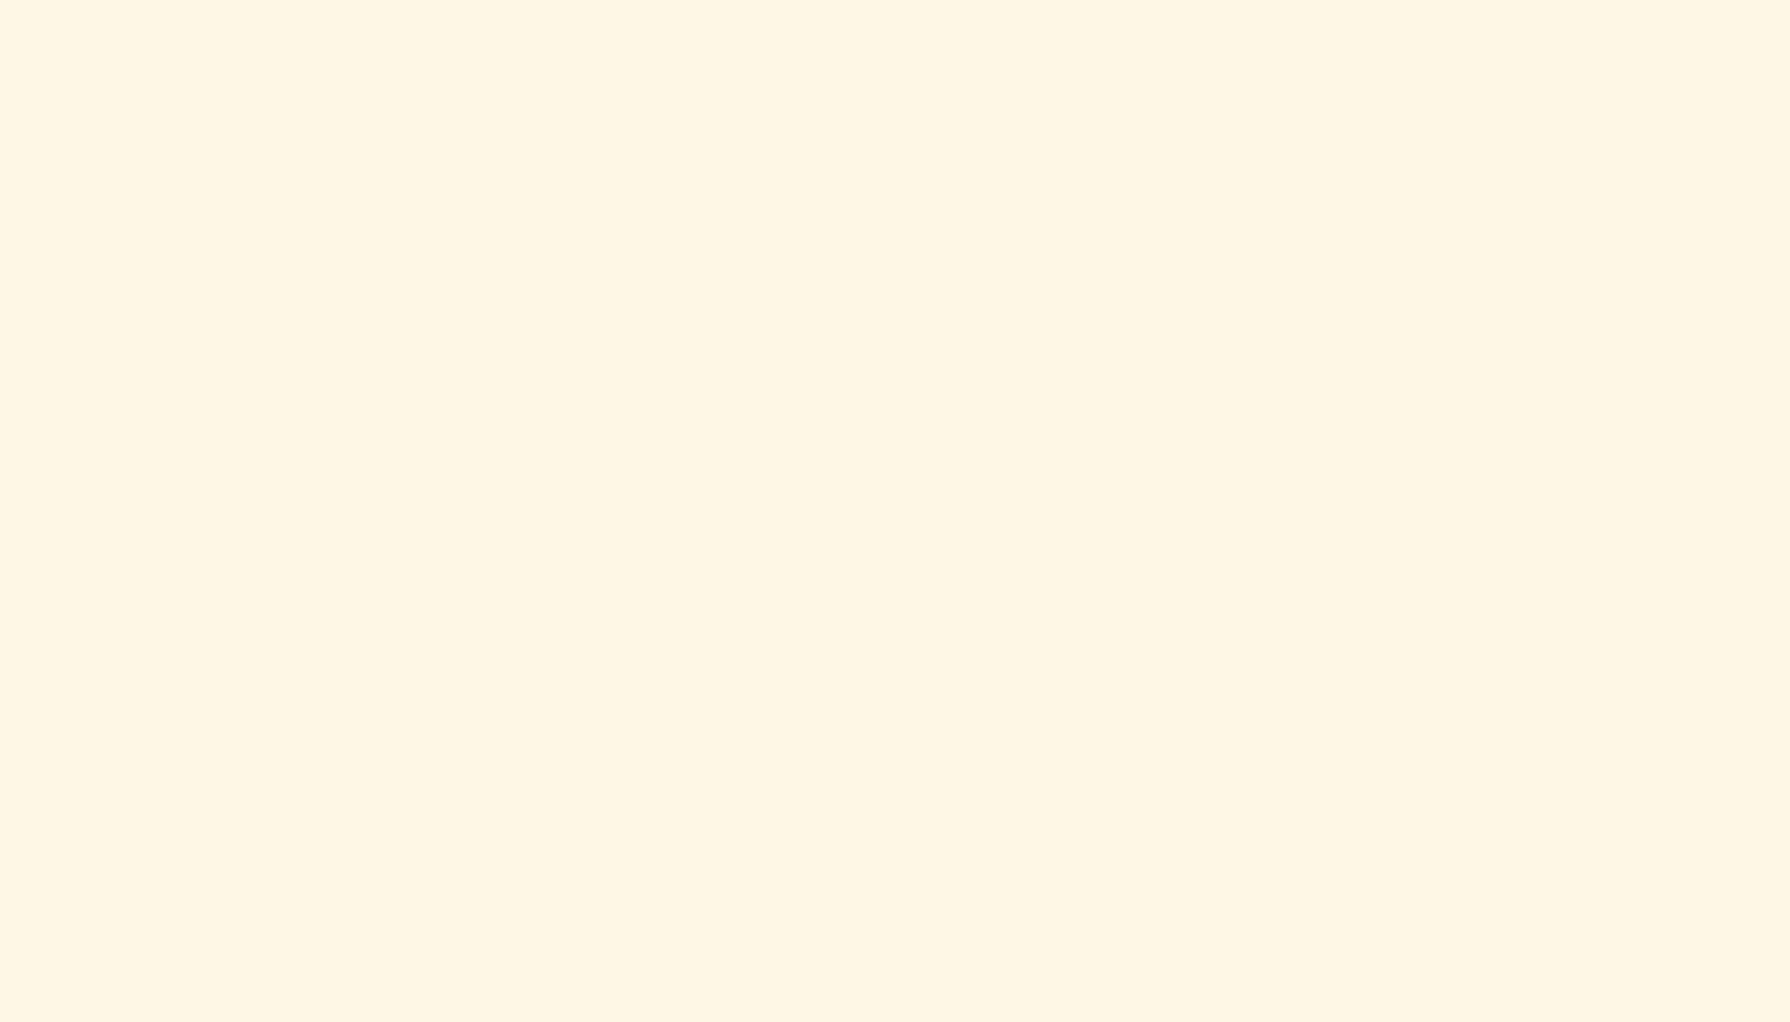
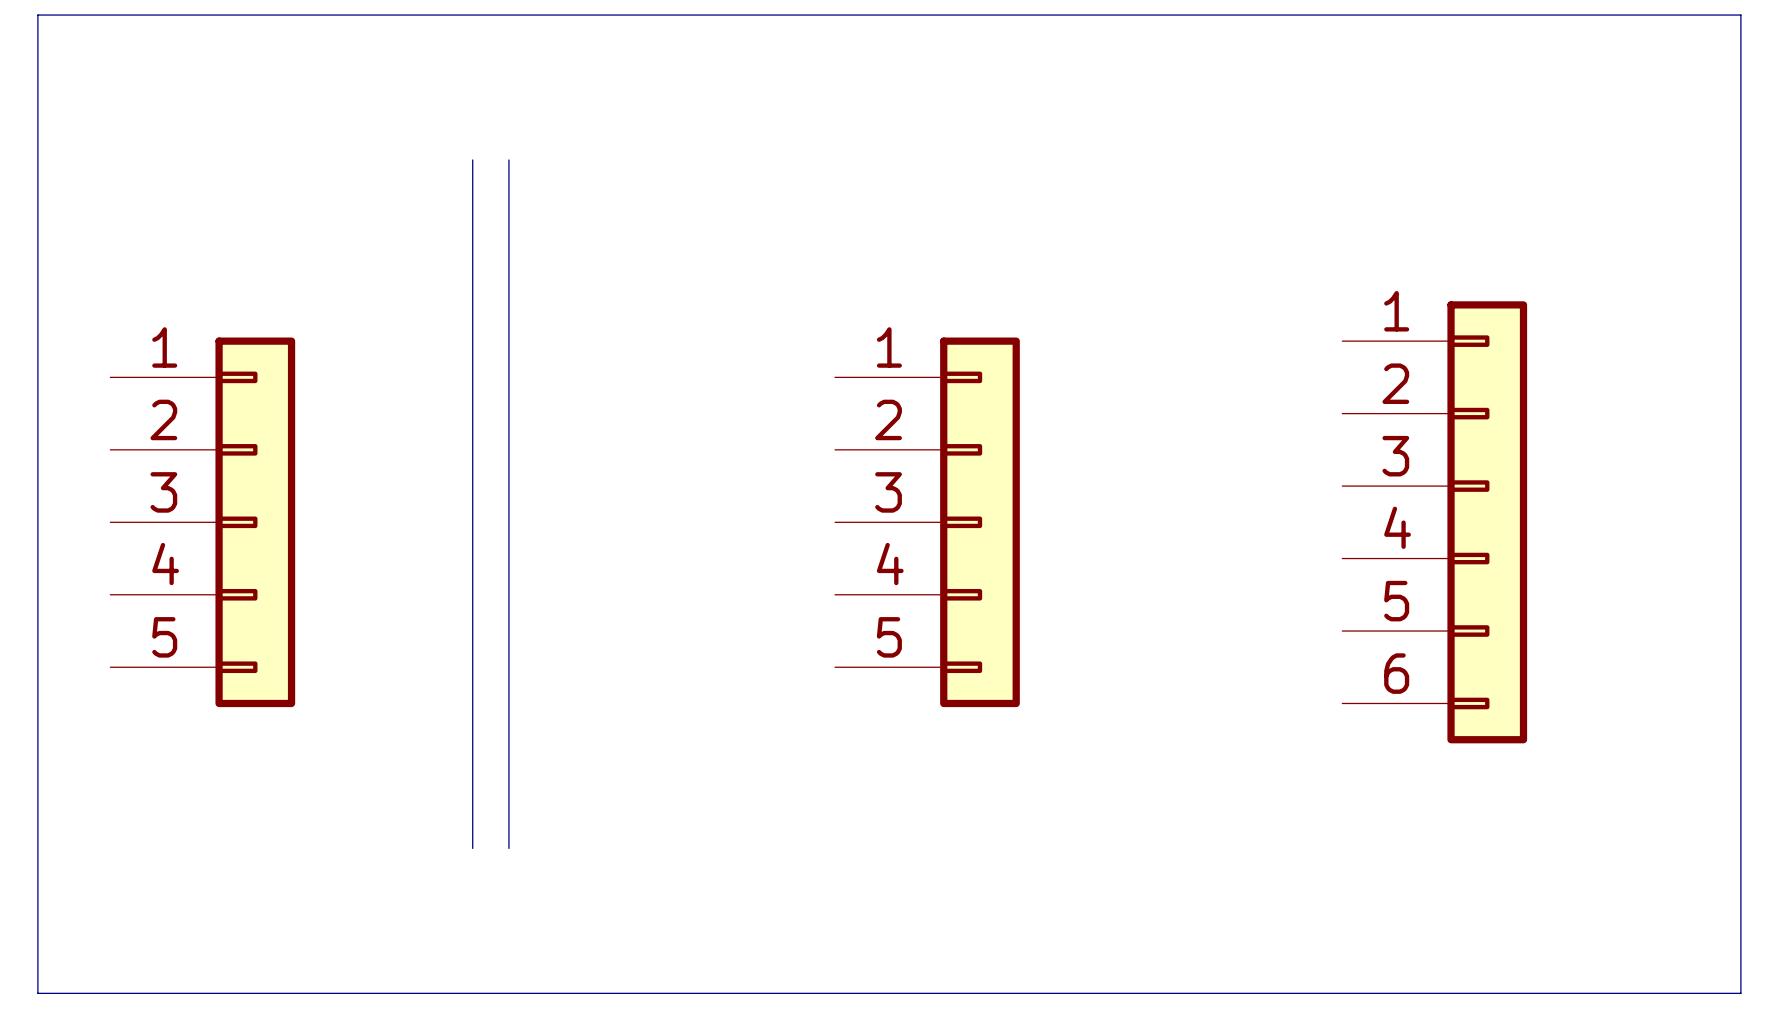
line: none -> (37, 15) (1740, 15) (1740, 993) (37, 993) (37, 15)
line: none -> (472, 159) (472, 848)
line: none -> (508, 159) (508, 848)
part: none -> (202, 522)
part: none -> (927, 522)
part: none -> (1434, 522)

